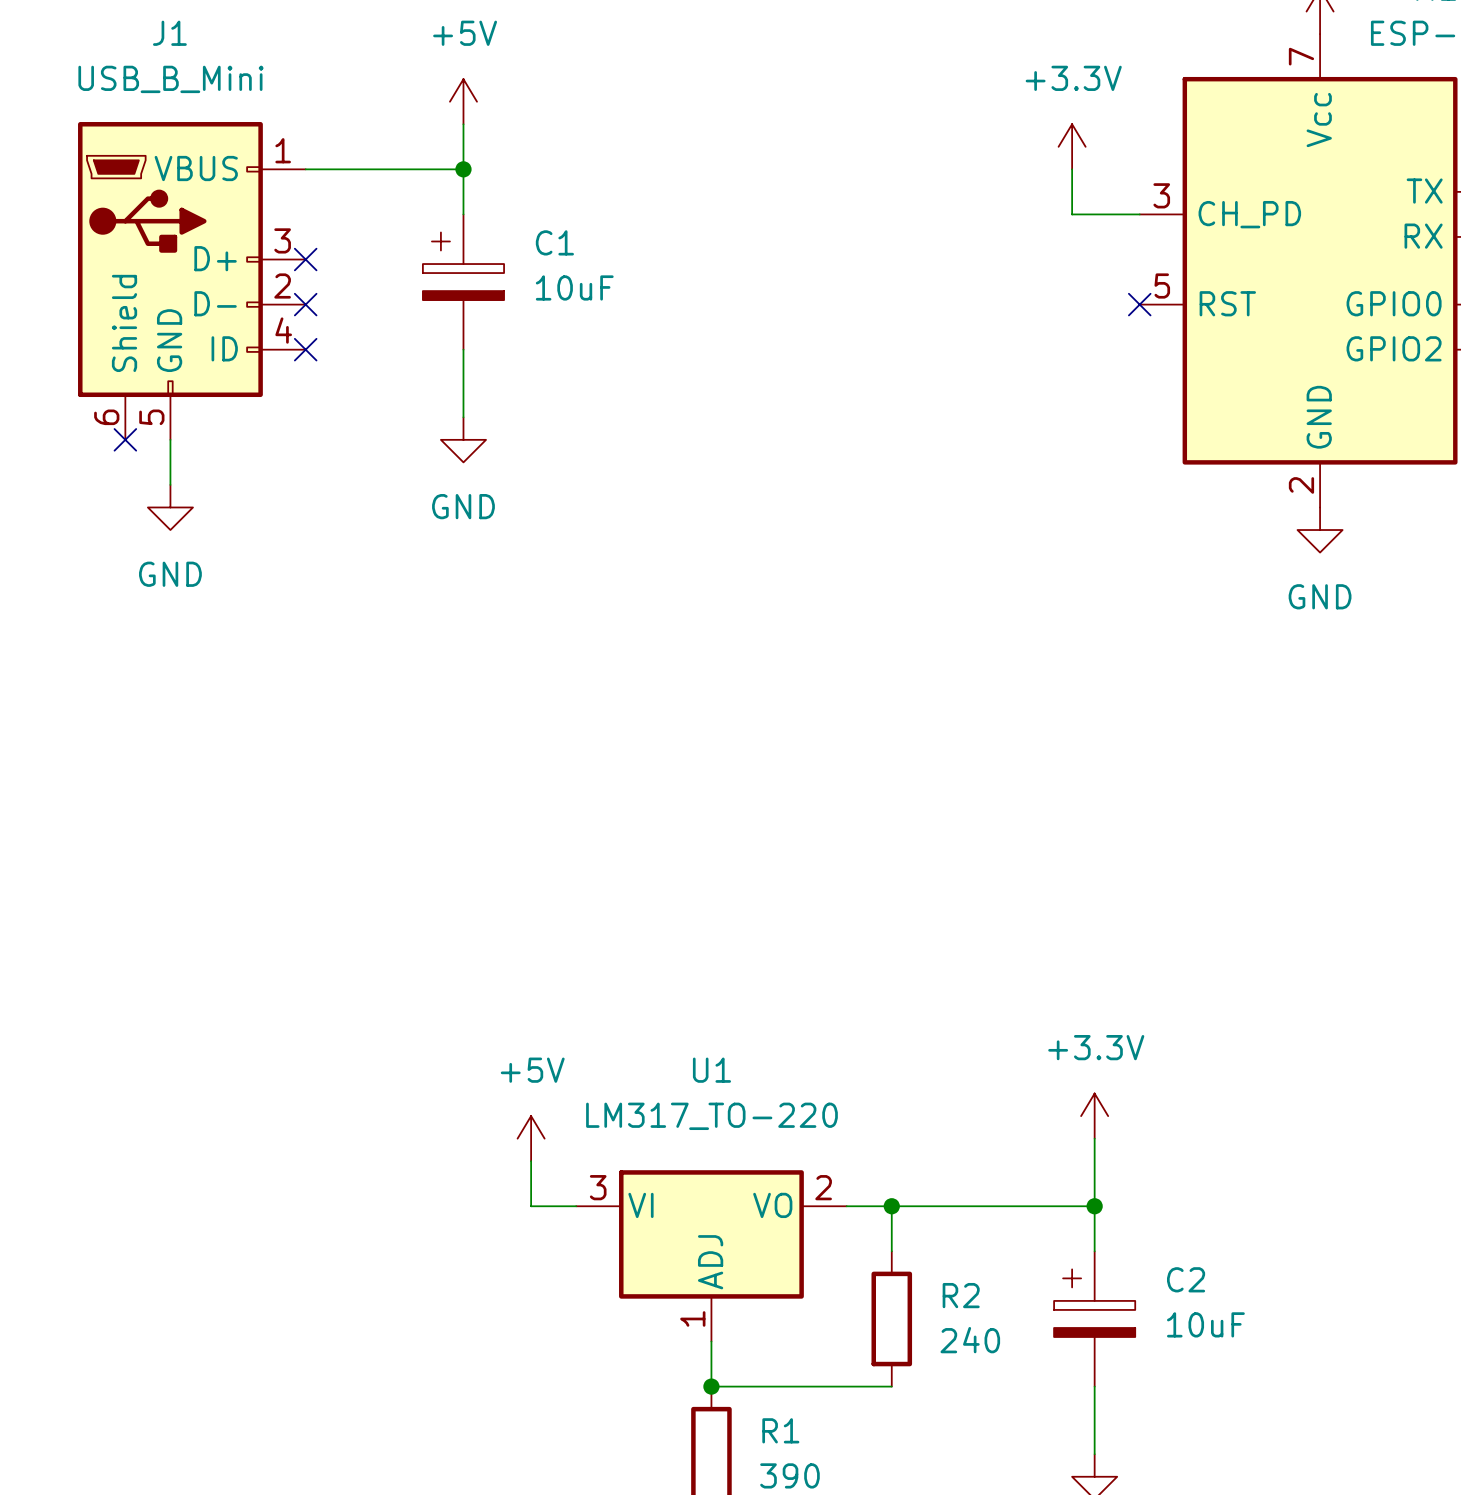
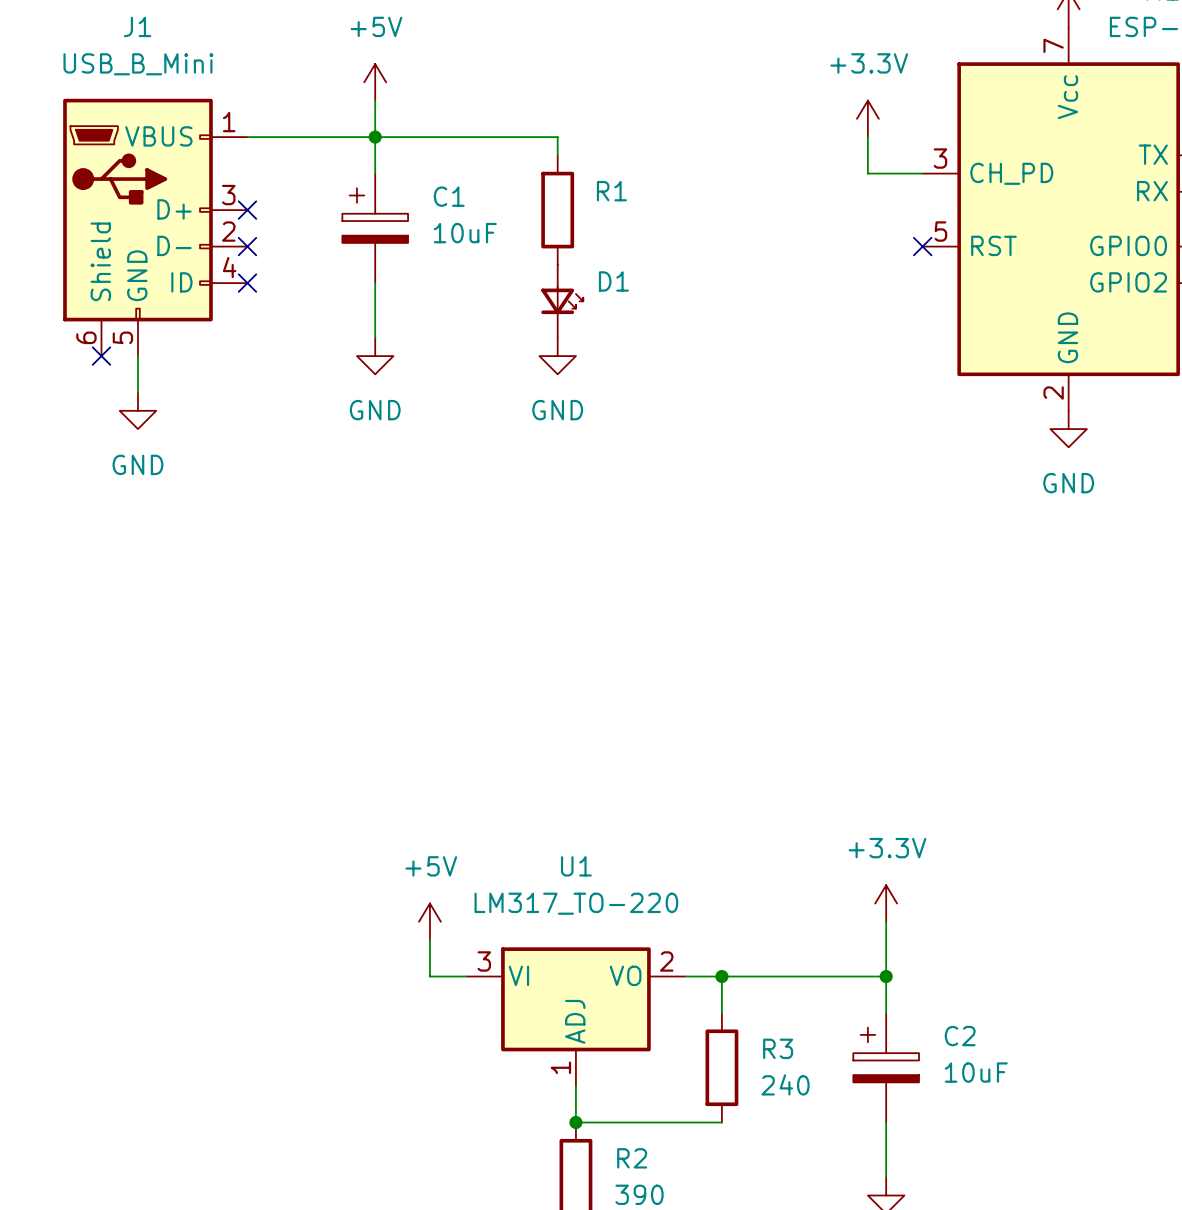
wire: none -> (375, 137) (557, 137) (557, 155)
R1: none -> (557, 210)
D1: none -> (562, 301)
power symbol: none -> GND (557, 356)
R2 name: R2 (961, 1295) -> R3 (778, 1048)
R1 name: R1 (780, 1430) -> R2 (632, 1158)

